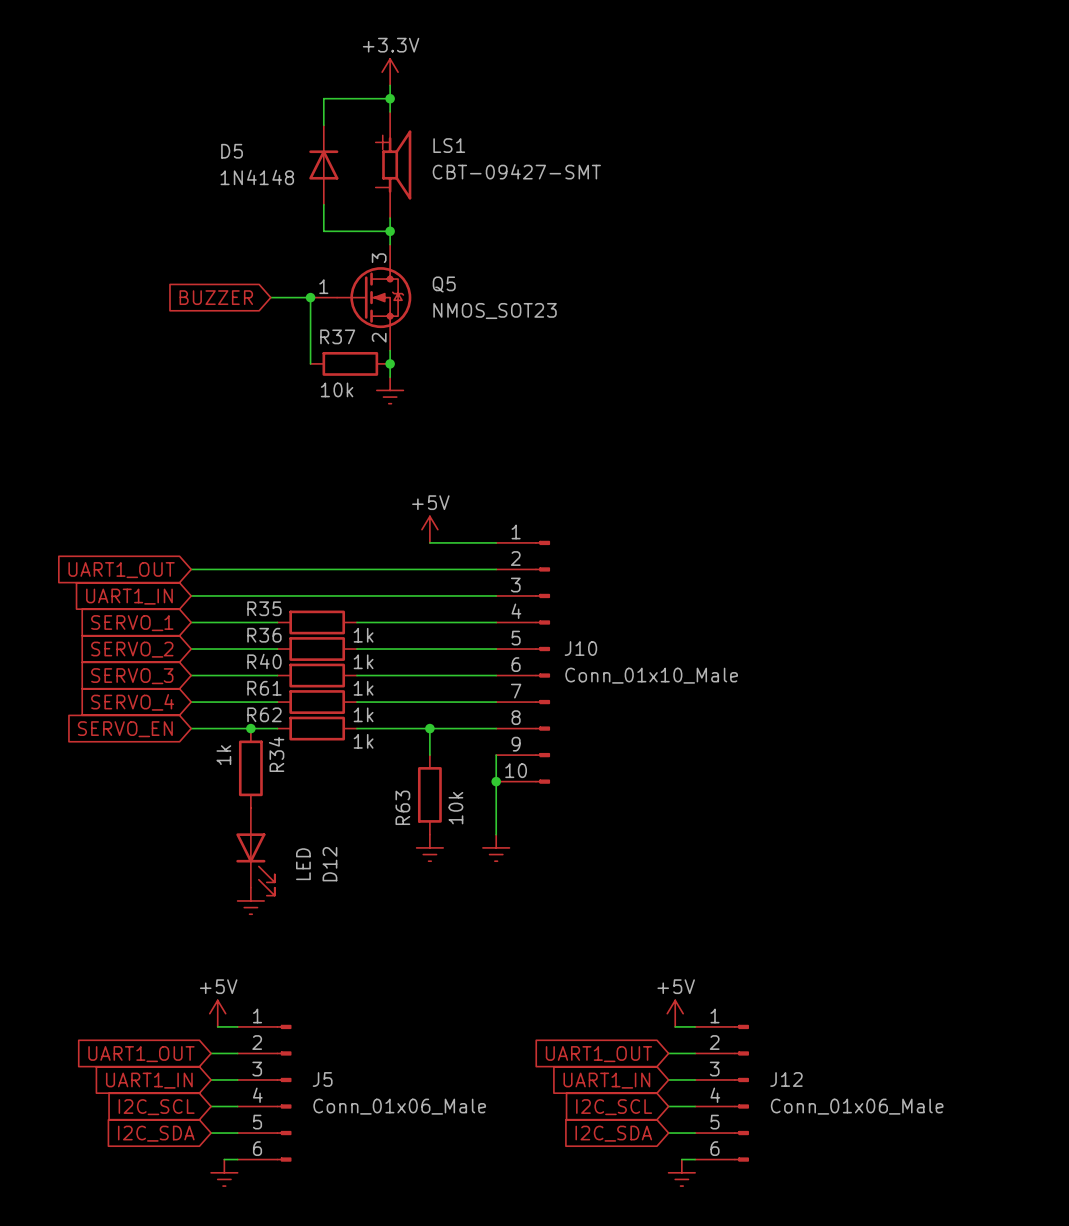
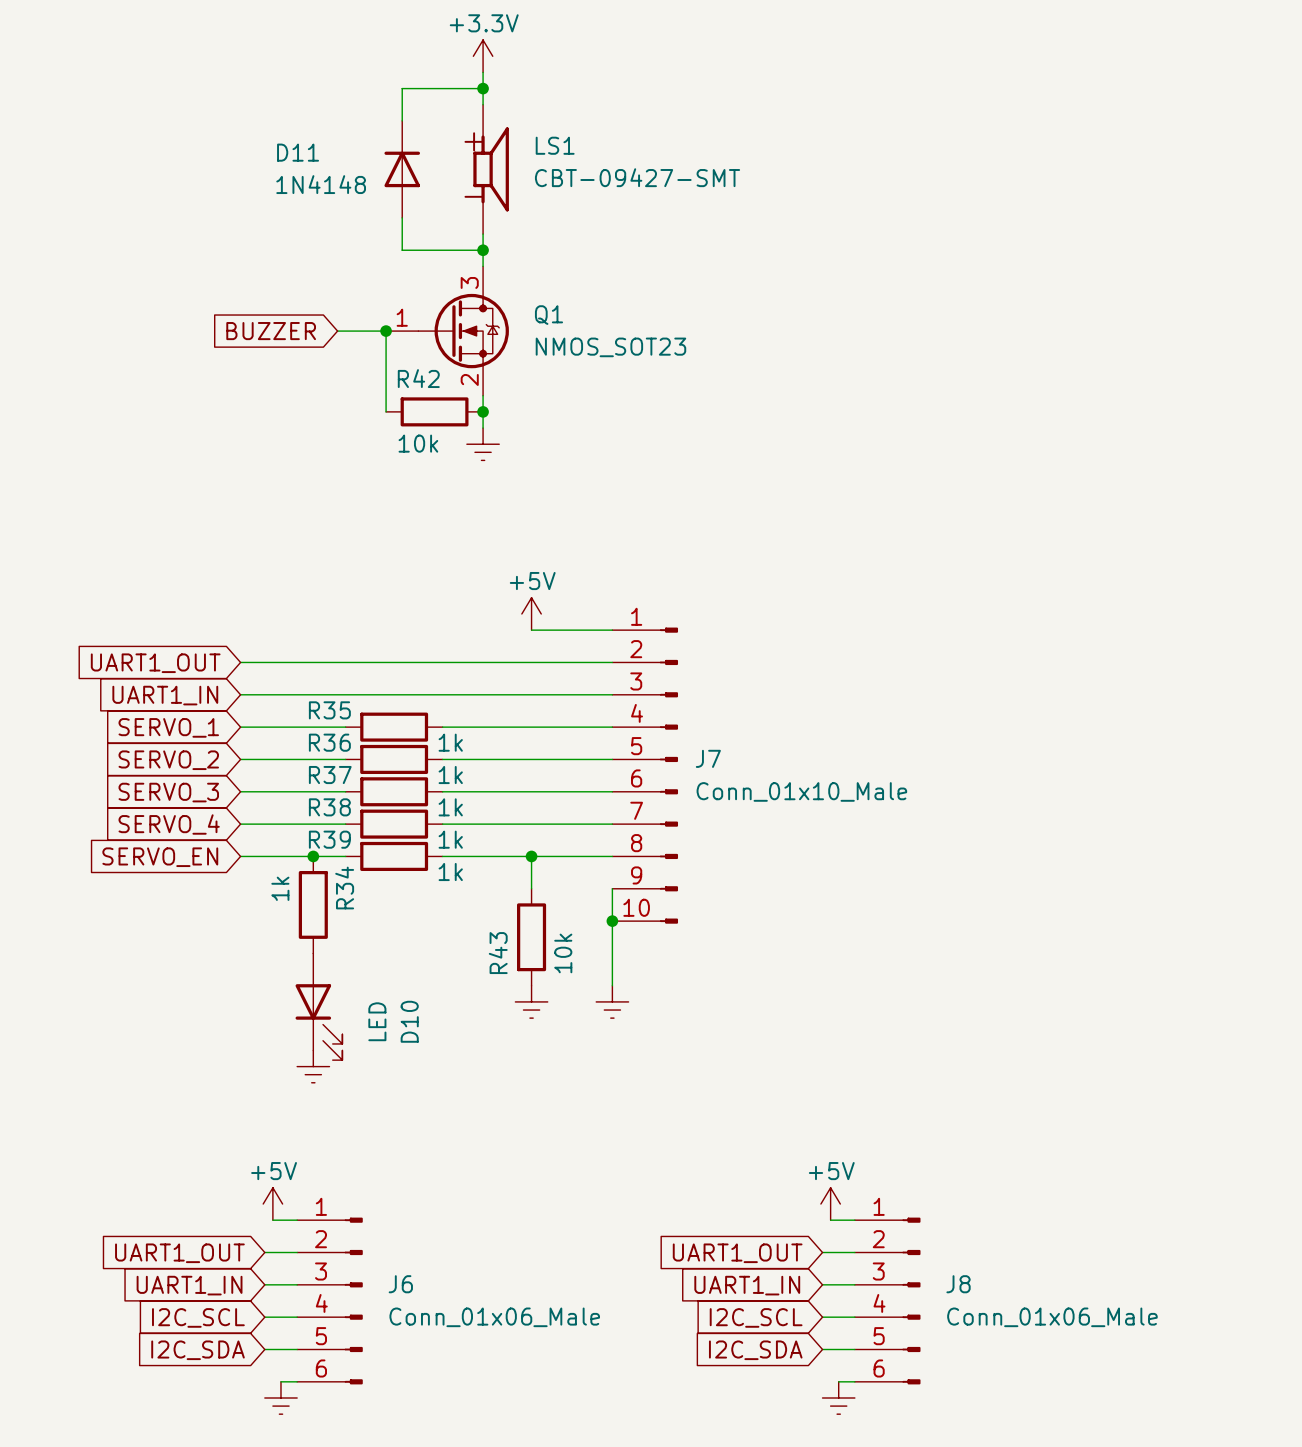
D5 name: D5 (232, 151) -> D11 (298, 152)
Q5 name: Q5 (444, 284) -> Q1 (548, 315)
R37 name: R37 (337, 336) -> R42 (418, 378)
J10 name: J10 (580, 648) -> J7 (708, 758)
R40 name: R40 (264, 661) -> R37 (330, 775)
R61 name: R61 (264, 688) -> R38 (329, 807)
R62 name: R62 (264, 714) -> R39 (329, 839)
R63 name: R63 (402, 807) -> R43 (498, 953)
D12 name: D12 (329, 864) -> D10 (409, 1021)
J5 name: J5 (322, 1079) -> J6 (400, 1284)
J12 name: J12 (786, 1079) -> J8 (958, 1284)

